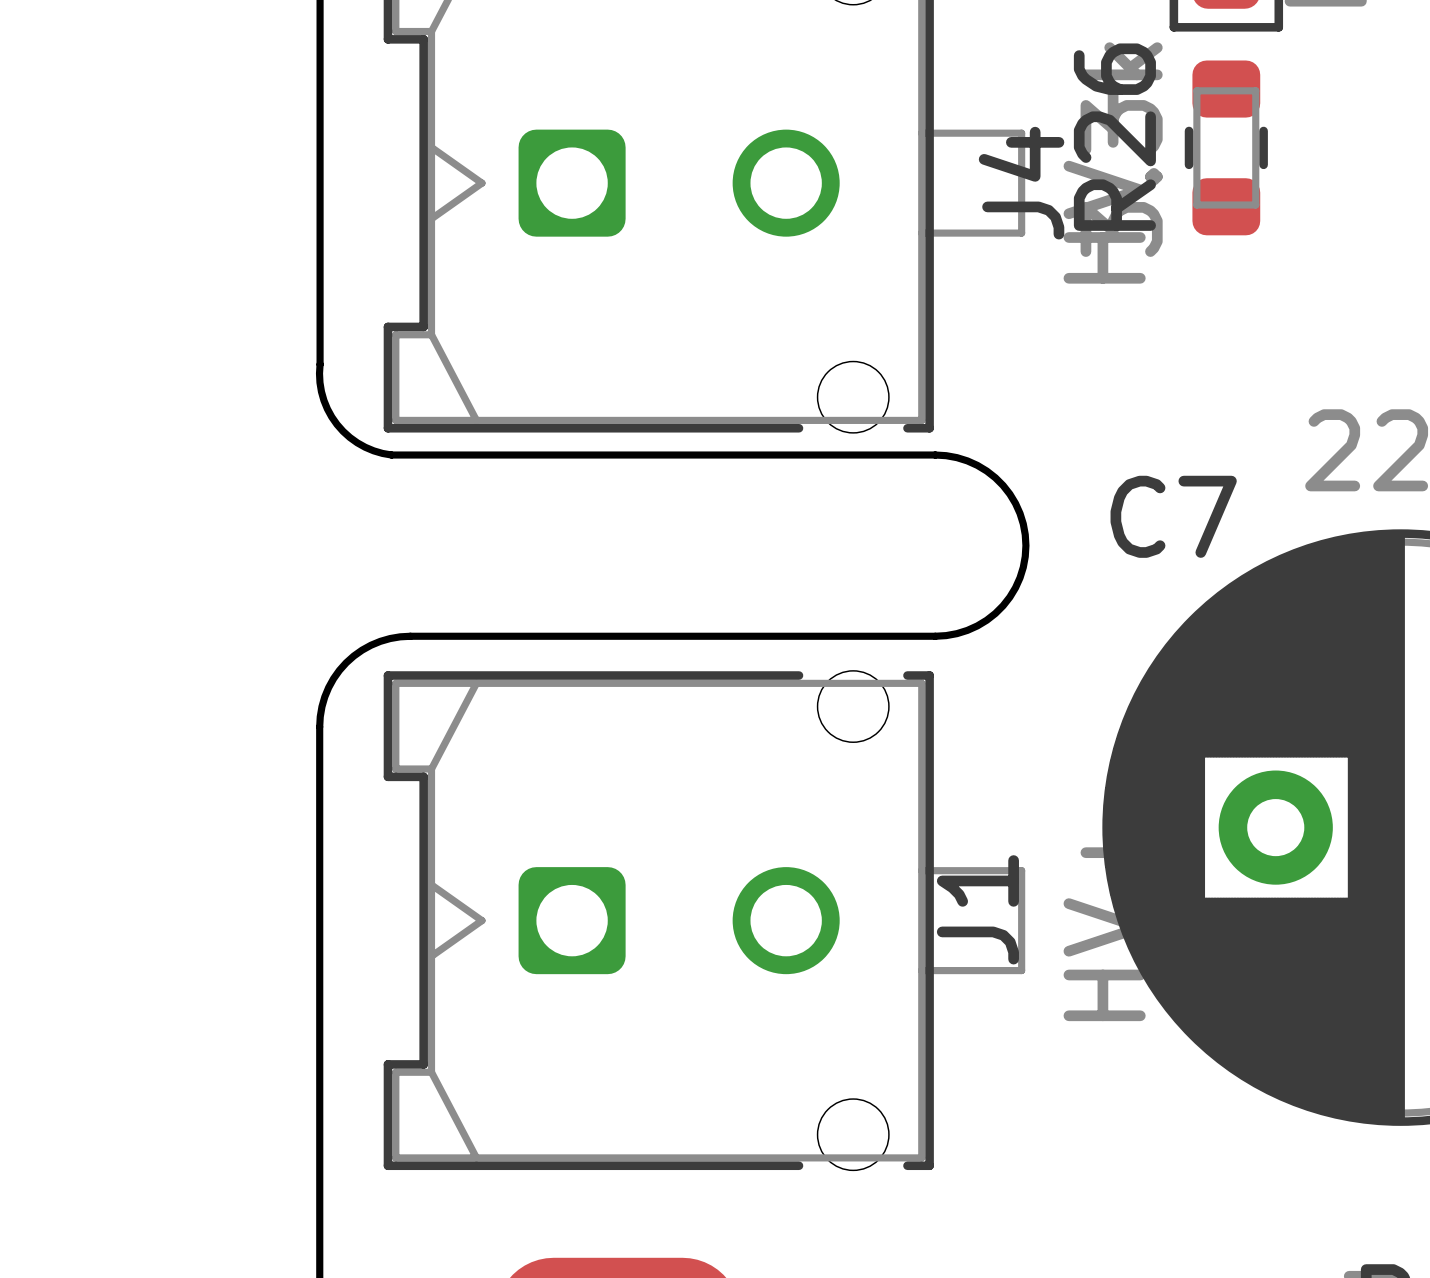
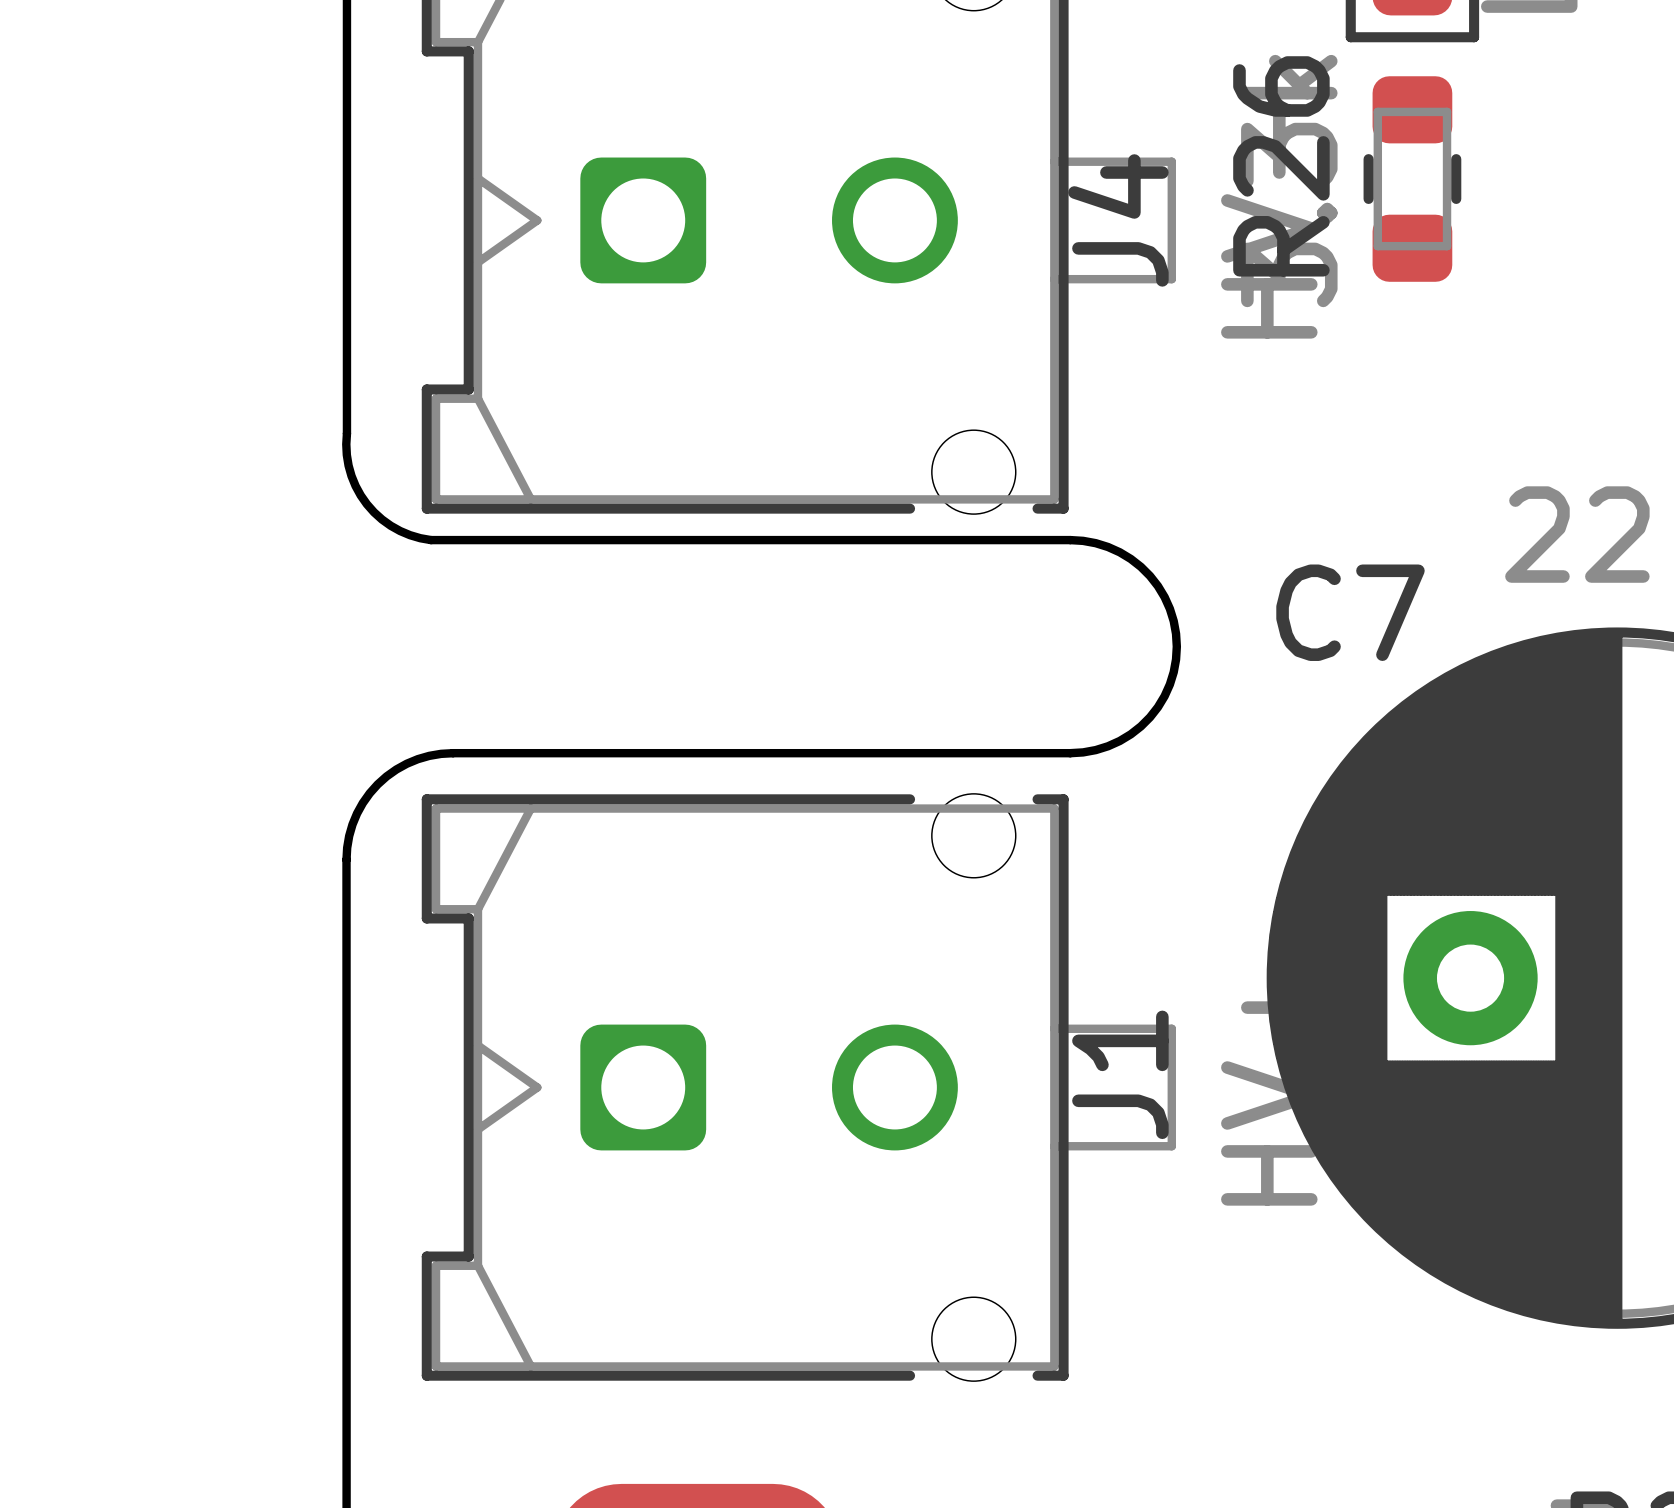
J4 name position: J4 (1021, 183) -> J4 (1118, 220)

